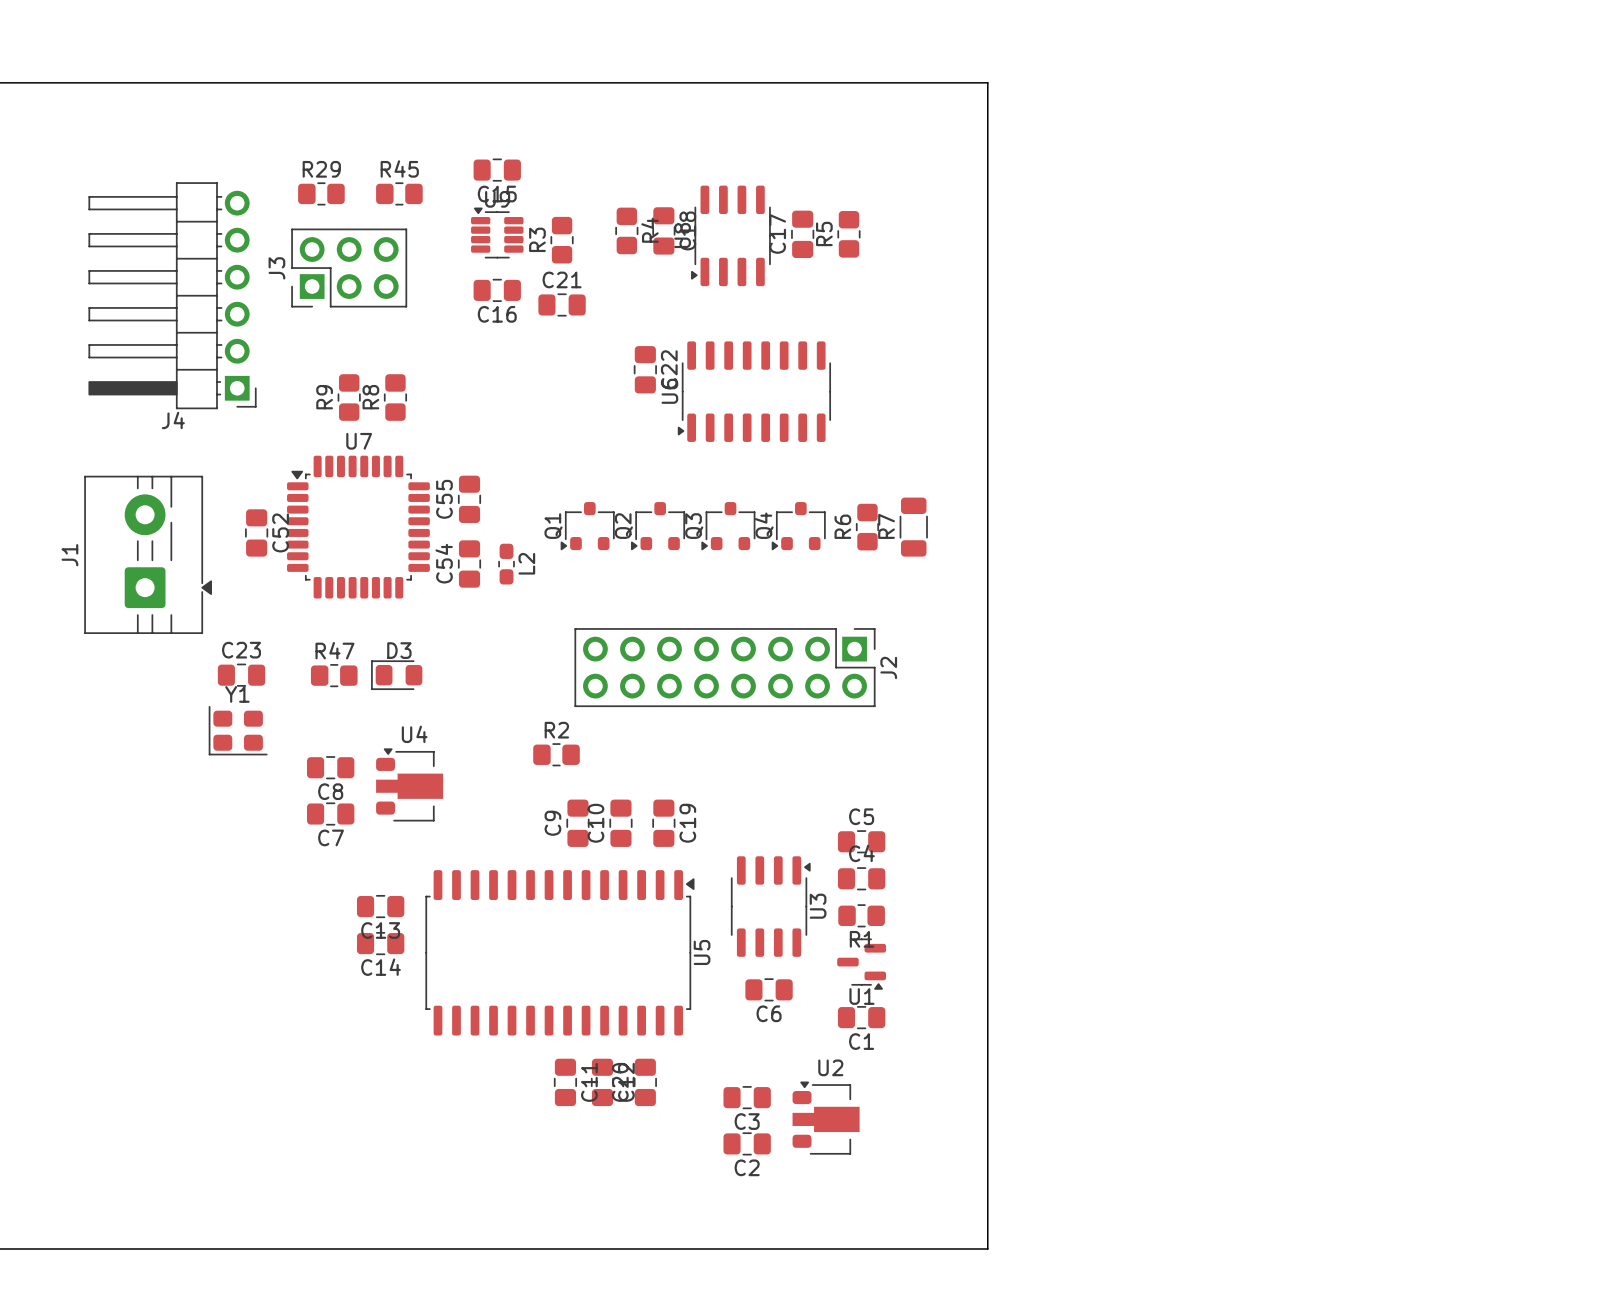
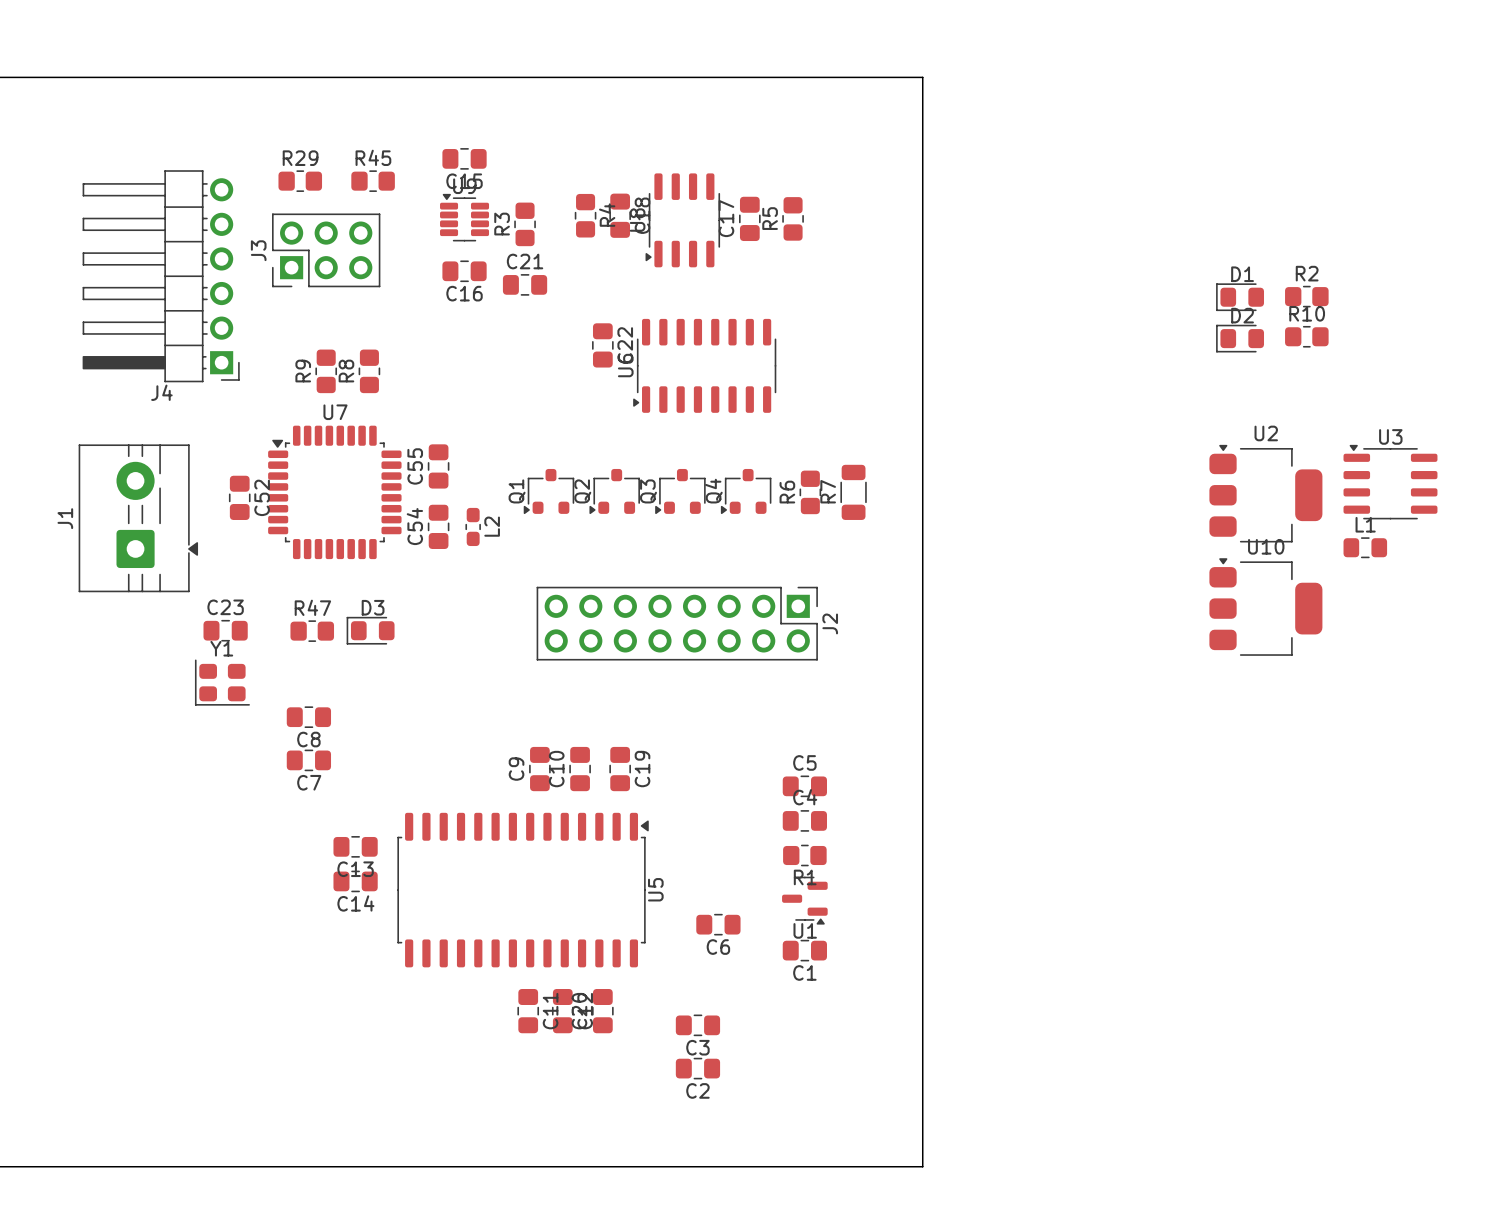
D1: none -> (1240, 297)
R10: none -> (1306, 336)
D2: none -> (1240, 338)
L1: none -> (1365, 547)
U10: none -> (1265, 607)
R2 position: (556, 754) -> (1306, 296)
U4: (409, 784) -> none
U3 rotation: 0° (770, 906) -> 90° counterclockwise (1390, 482)
U3 position: (770, 906) -> (1390, 482)
U2 footprint: [792, 1081, 860, 1155] -> [1209, 444, 1323, 543]

